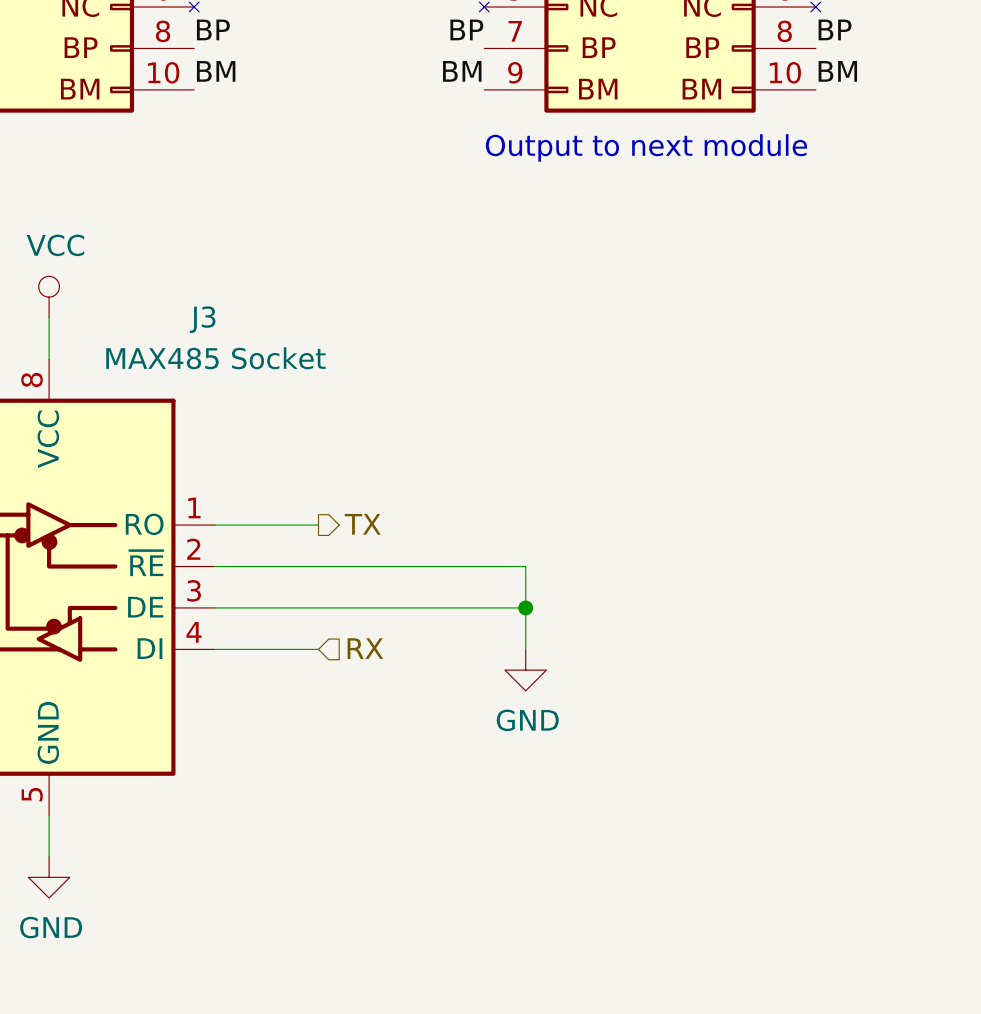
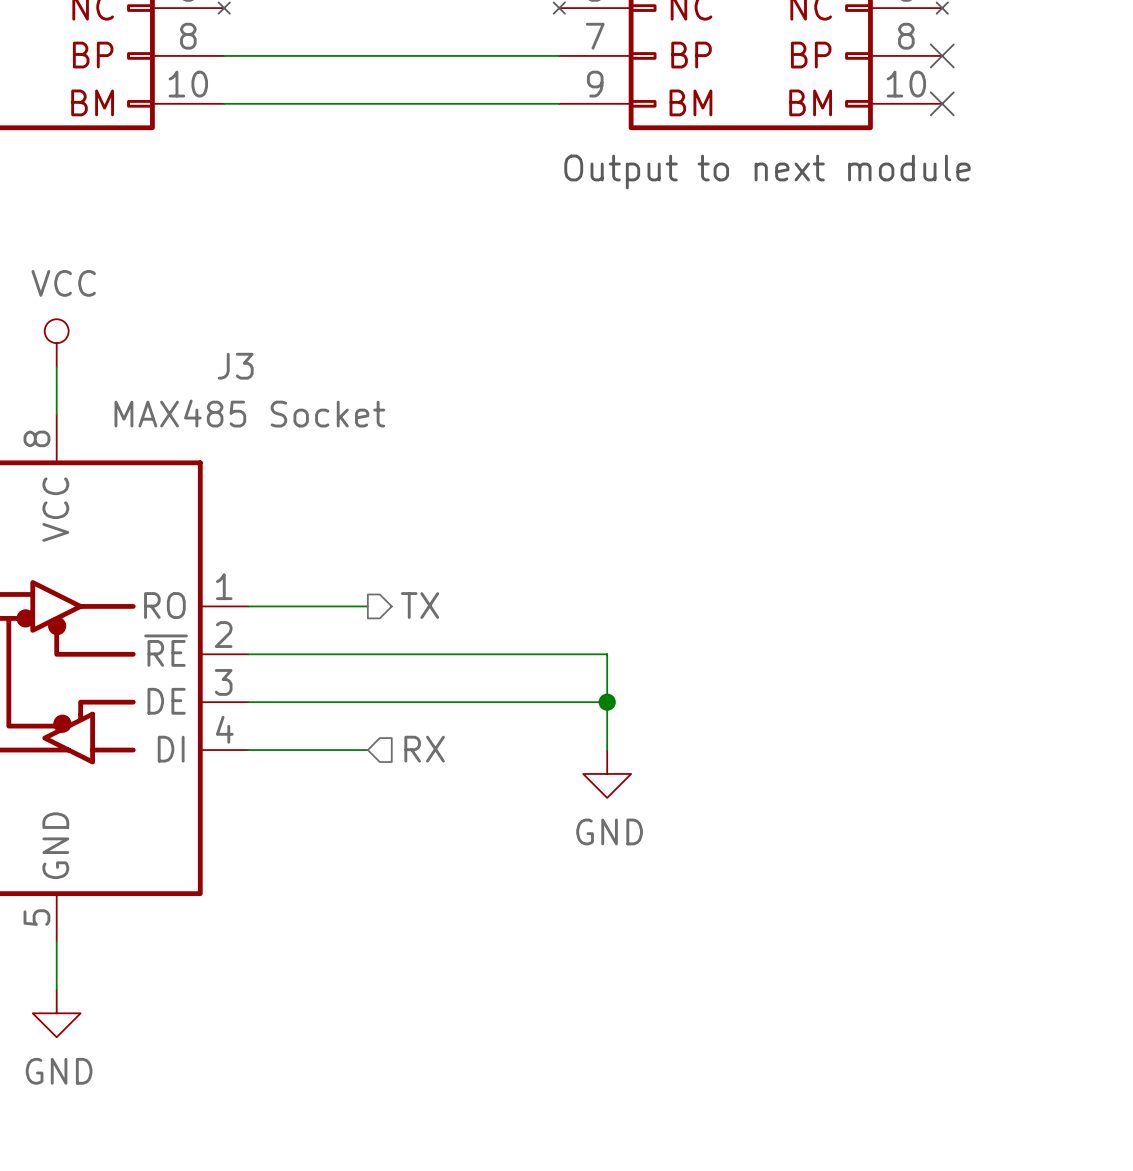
label: BP (213, 29) -> none
label: BP (466, 29) -> none
label: BP (835, 29) -> none
wire: none -> (224, 55) (559, 55)
no-connect mark: none -> (942, 55)
label: BM (216, 71) -> none
label: BM (462, 71) -> none
label: BM (837, 71) -> none
wire: none -> (224, 103) (559, 103)
no-connect mark: none -> (942, 103)

